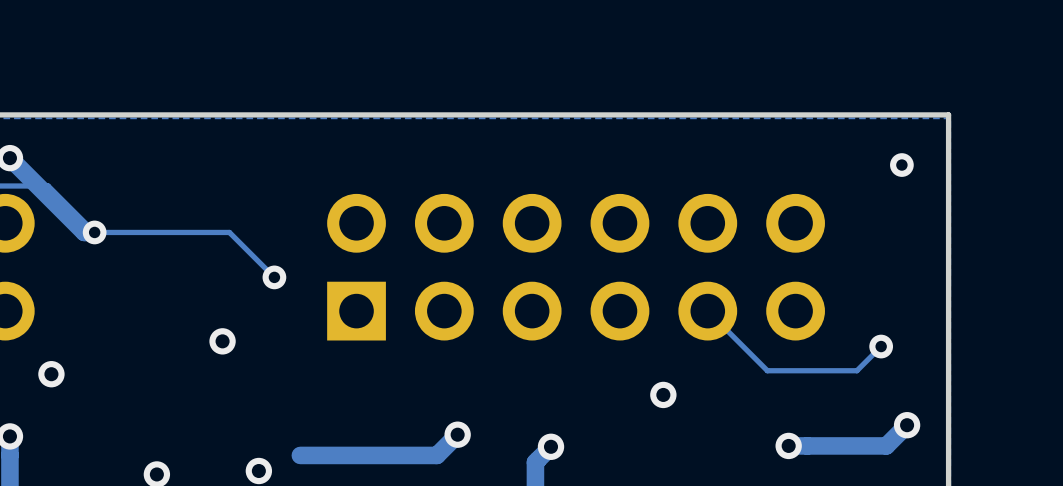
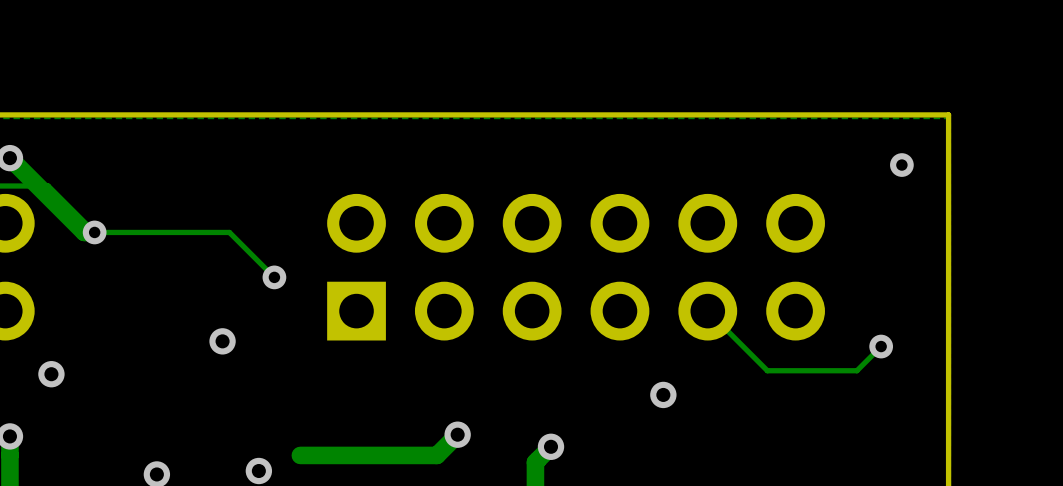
track: (907, 425) (886, 445) (788, 445) -> none
via: (907, 425) -> none
via: (788, 445) -> none

